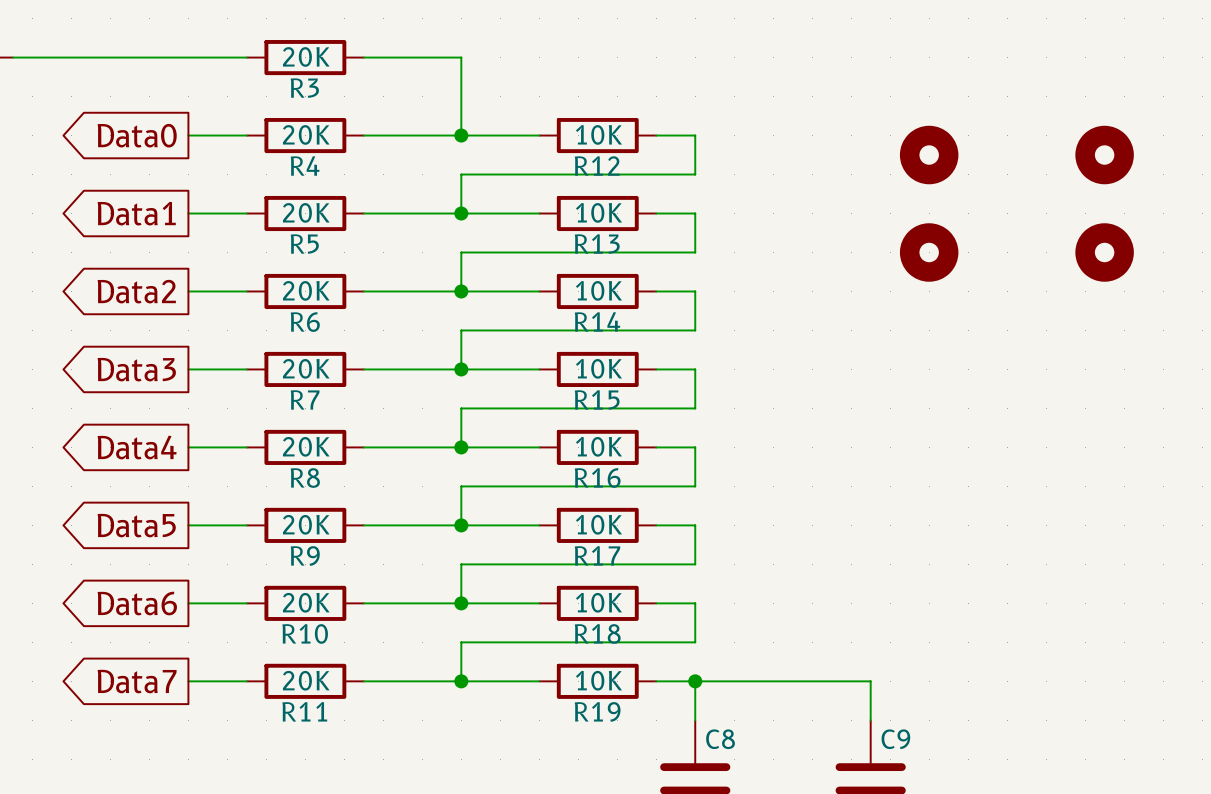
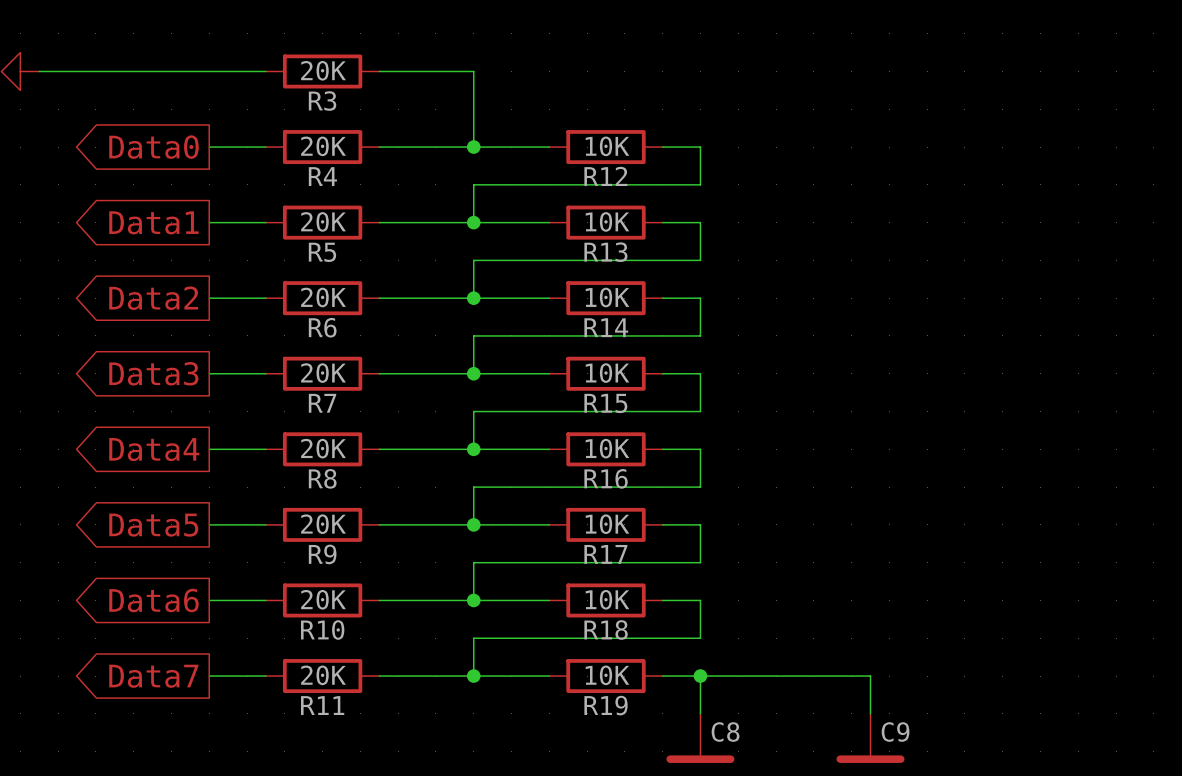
part: (929, 155) -> none
part: (1104, 155) -> none
part: (929, 252) -> none
part: (1104, 252) -> none

